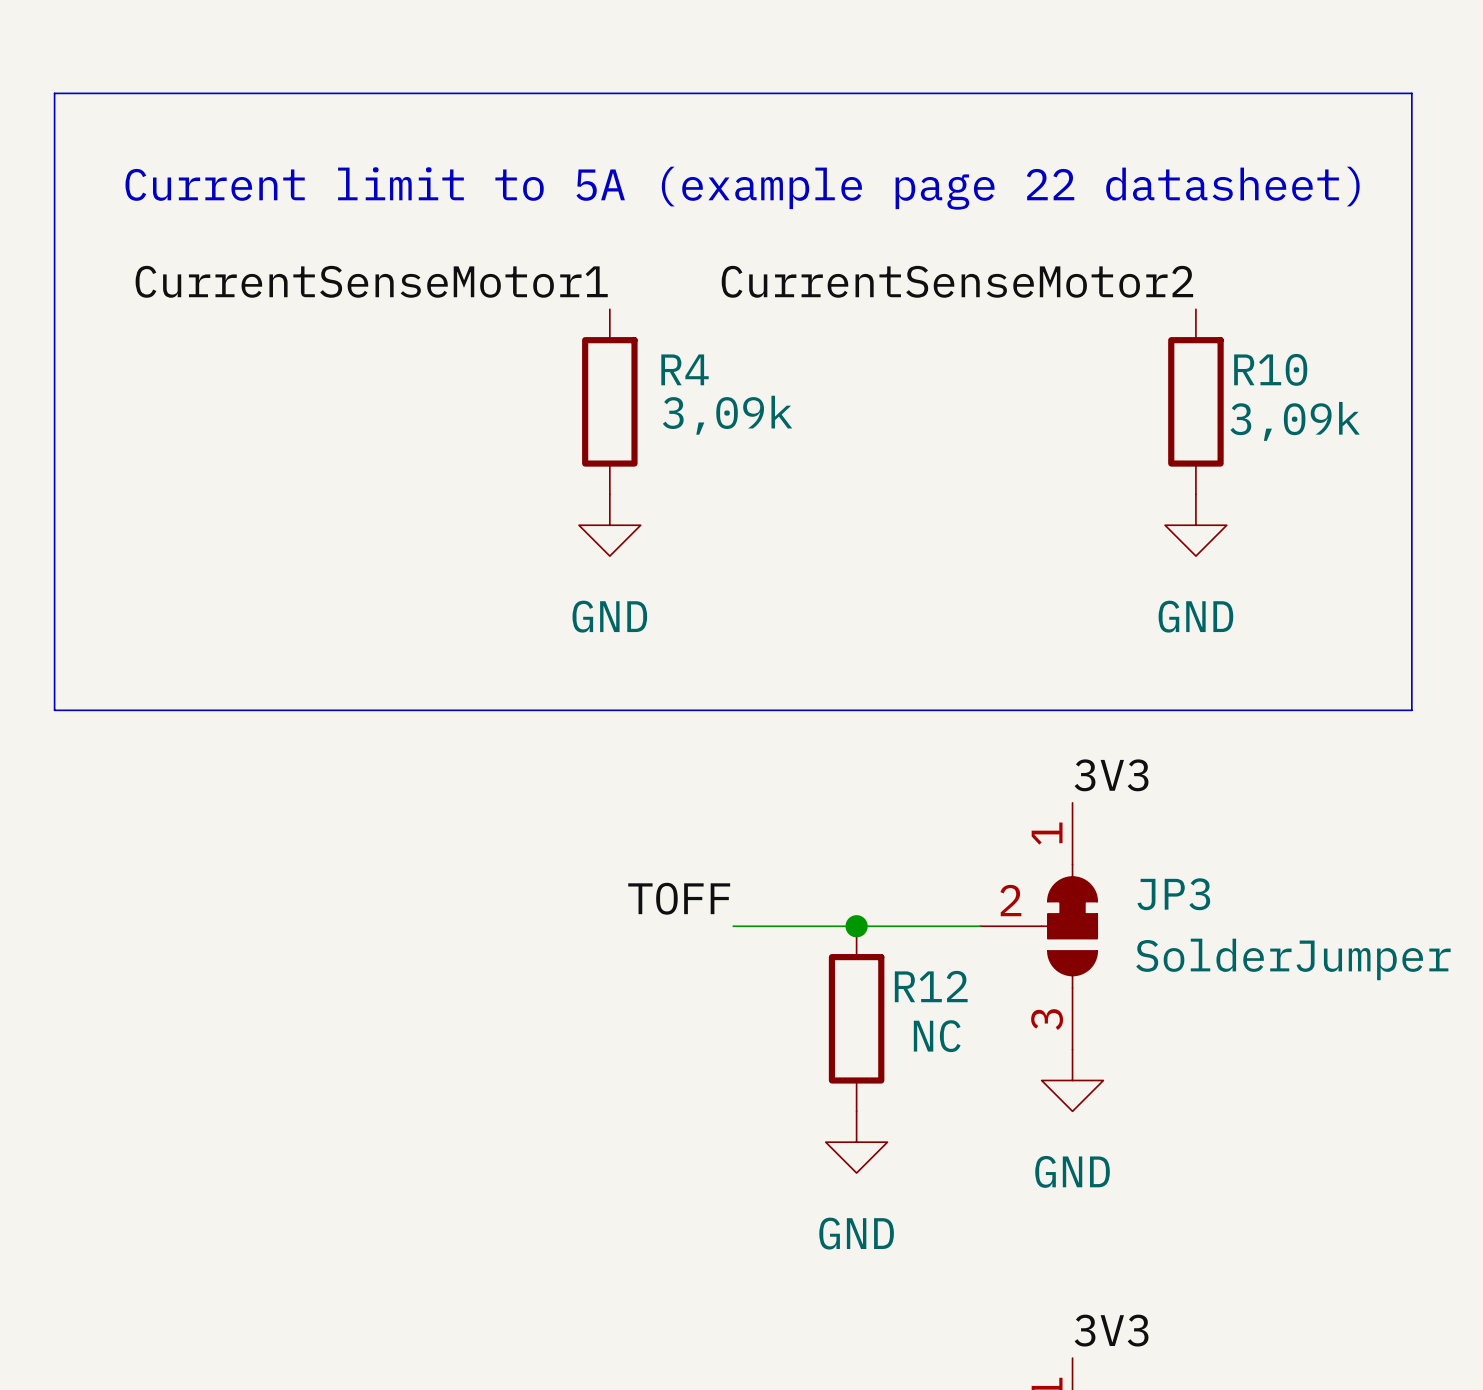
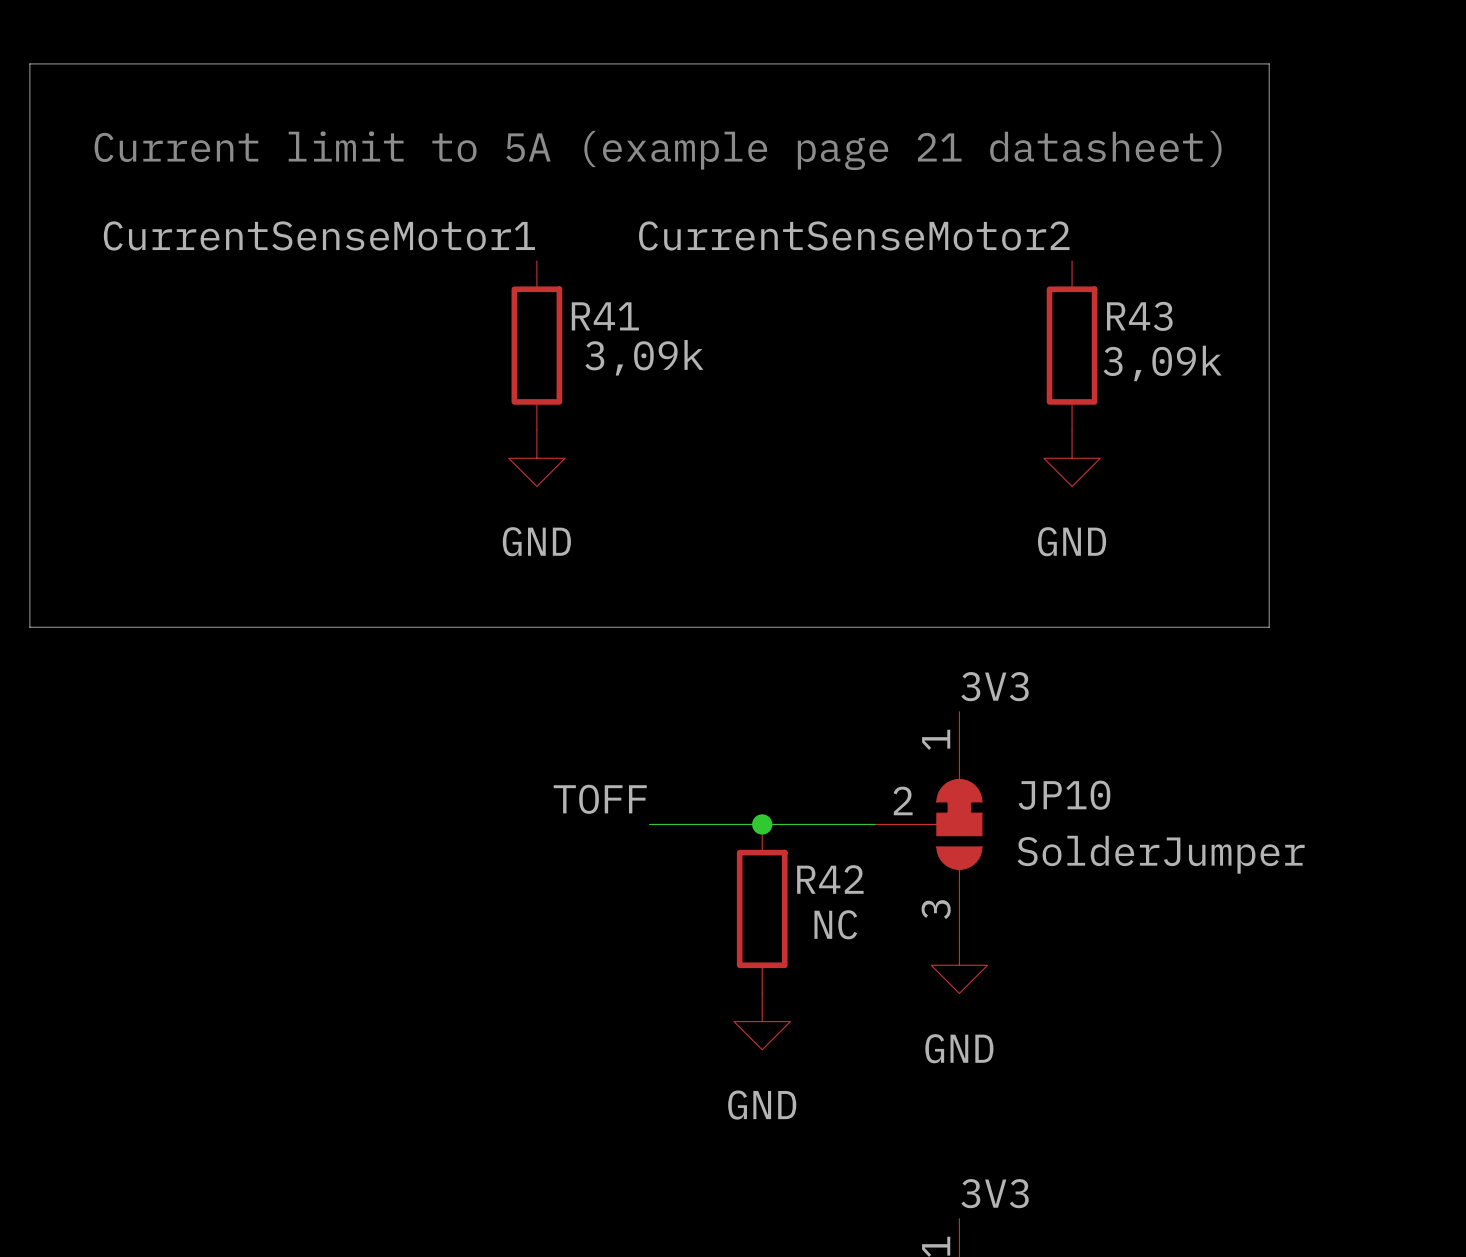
text: Current limit to 5A (example page 22 datasheet) (742, 188) -> Current limit to 5A (example page 21 datasheet) (658, 150)
R4 name: R4 (685, 369) -> R41 (605, 316)
R10 name: R10 (1270, 369) -> R43 (1139, 316)
JP3 name: JP3 (1173, 894) -> JP10 (1064, 795)
R12 name: R12 (931, 986) -> R42 (830, 879)

